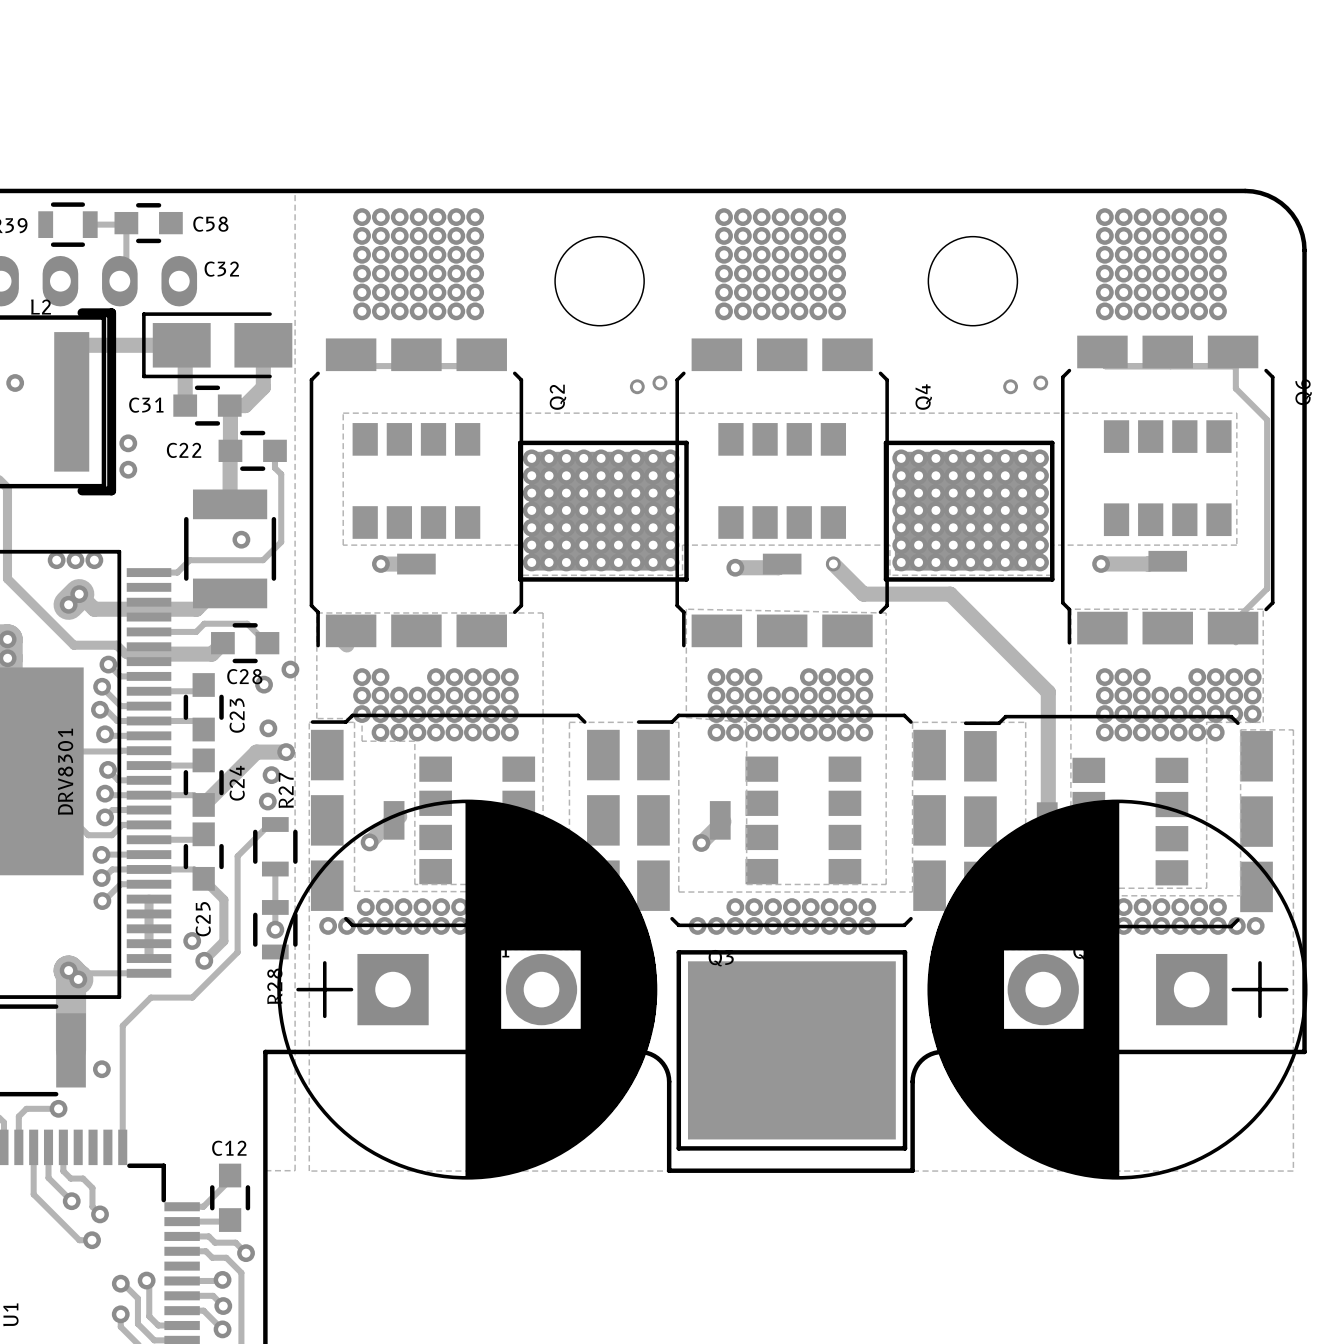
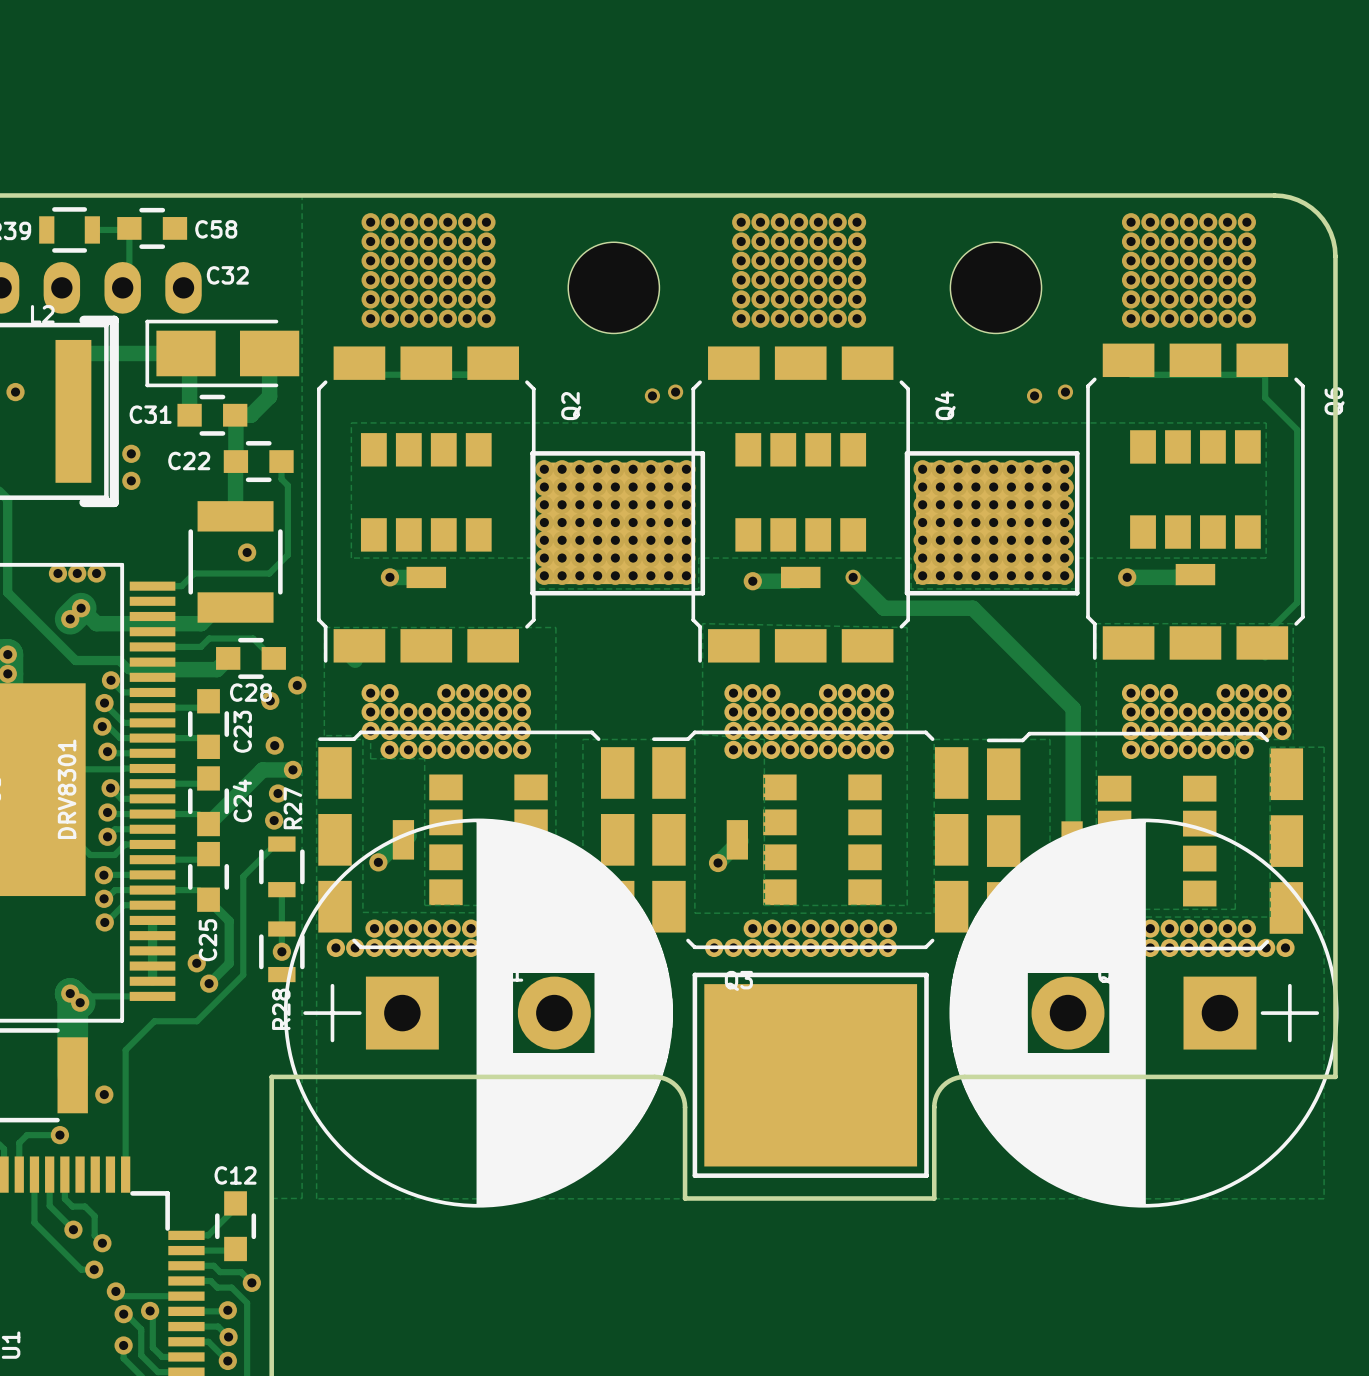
track: none -> (115, 1291) (120, 1296) (186, 1296)
via: none -> (115, 1291)

